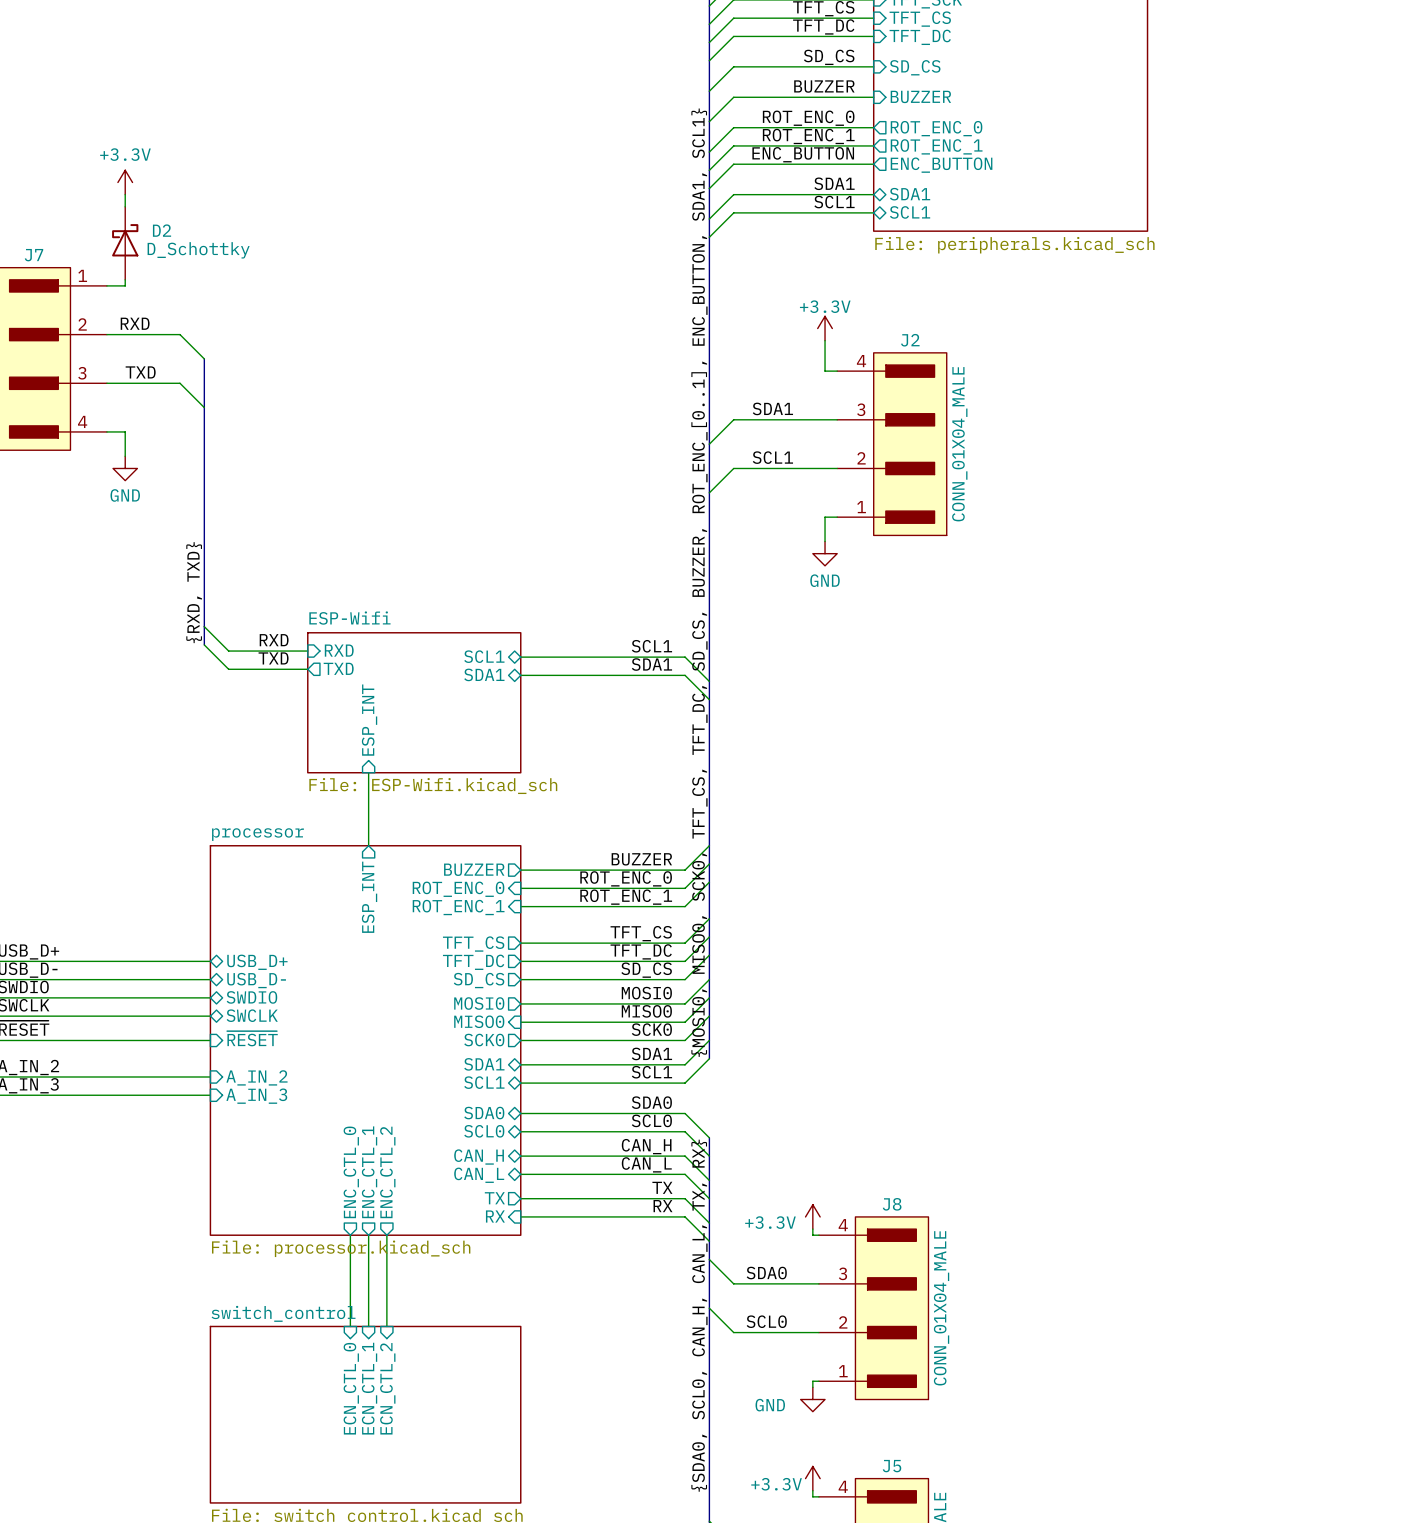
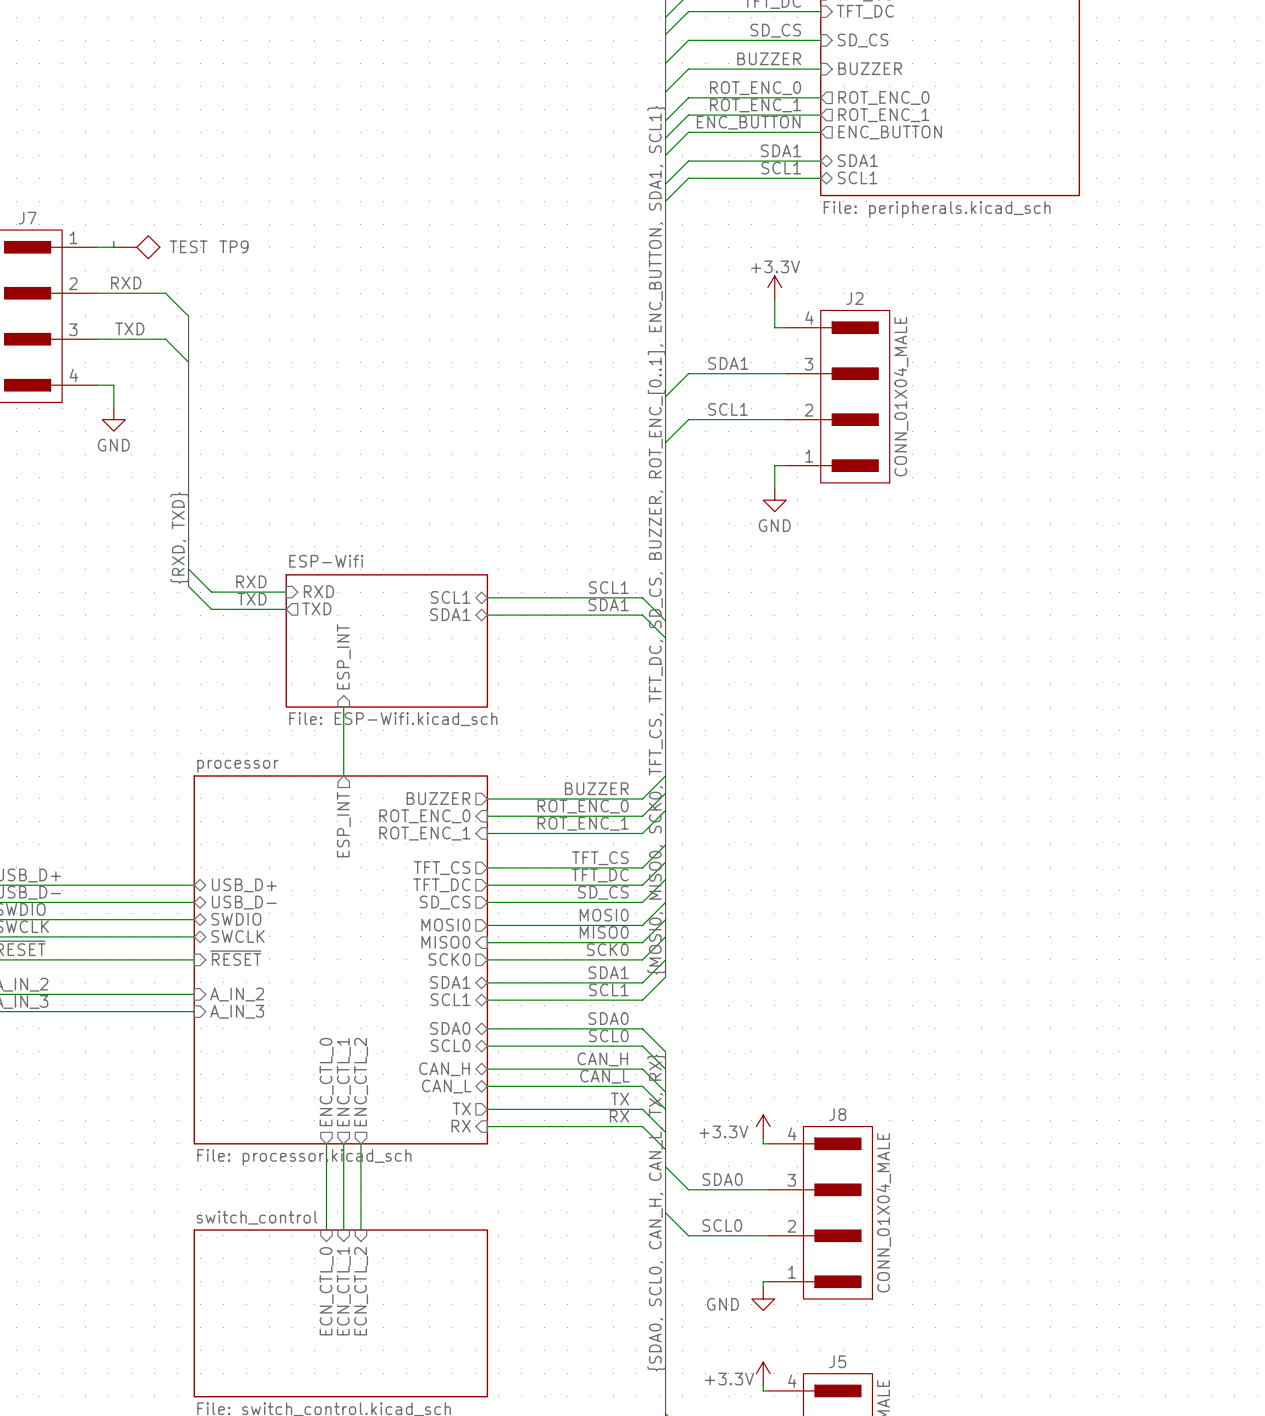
power symbol: +3.3V (125, 182) -> none
wire: (125, 194) (125, 206) -> none
D2: D_Schottky (125, 243) -> none
TP9: none -> TEST (136, 247)

